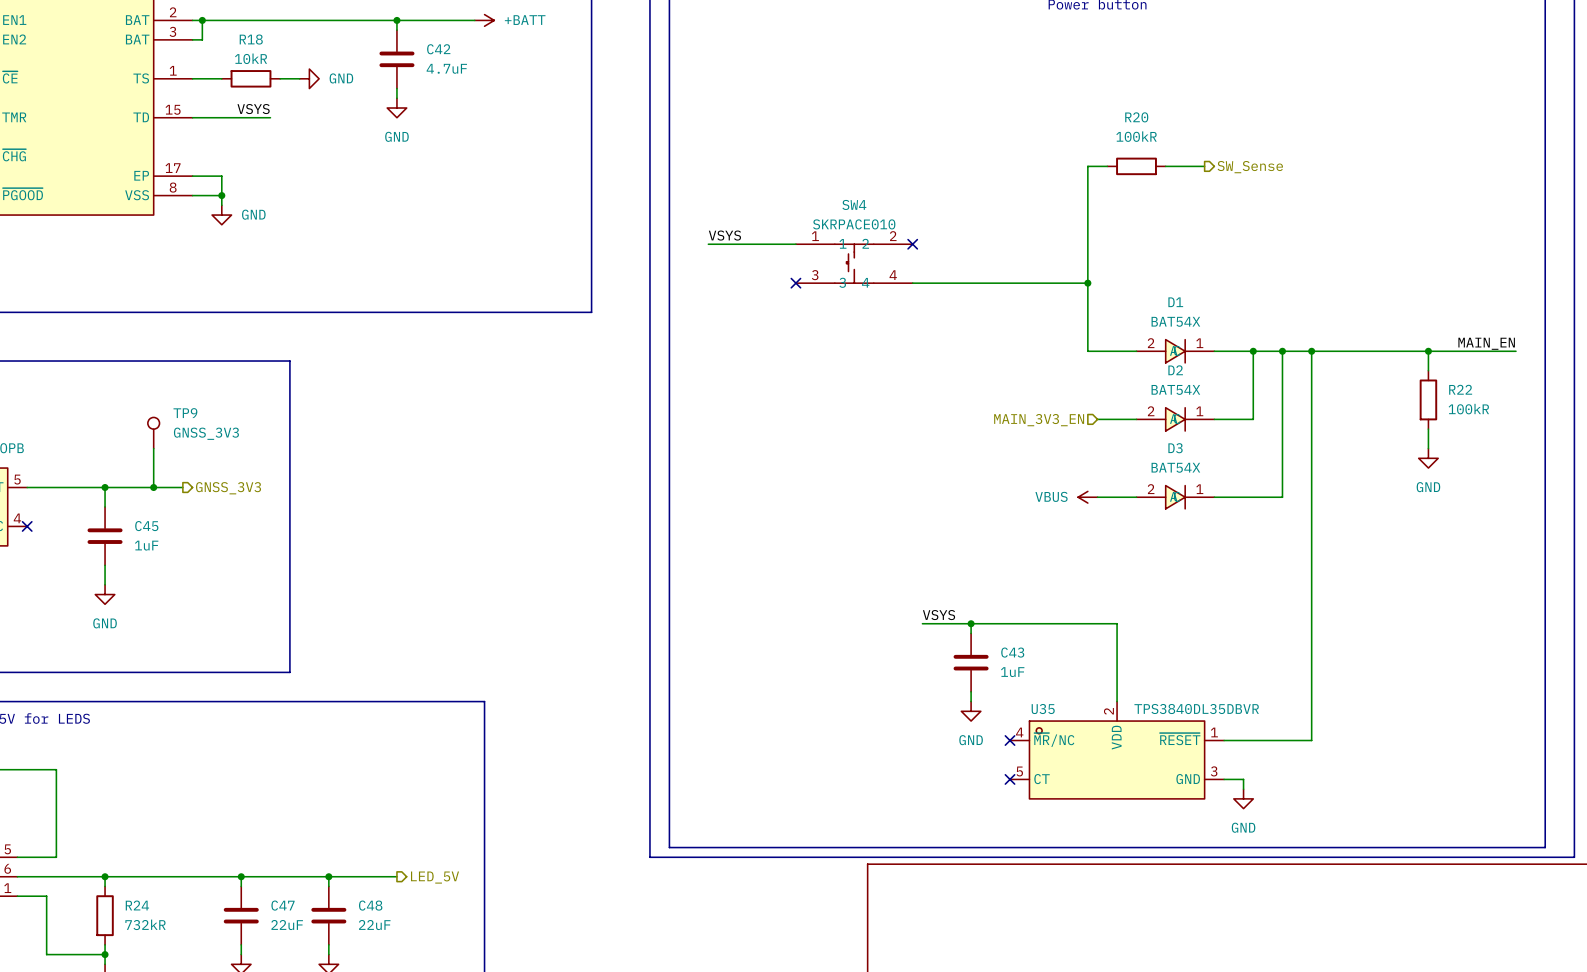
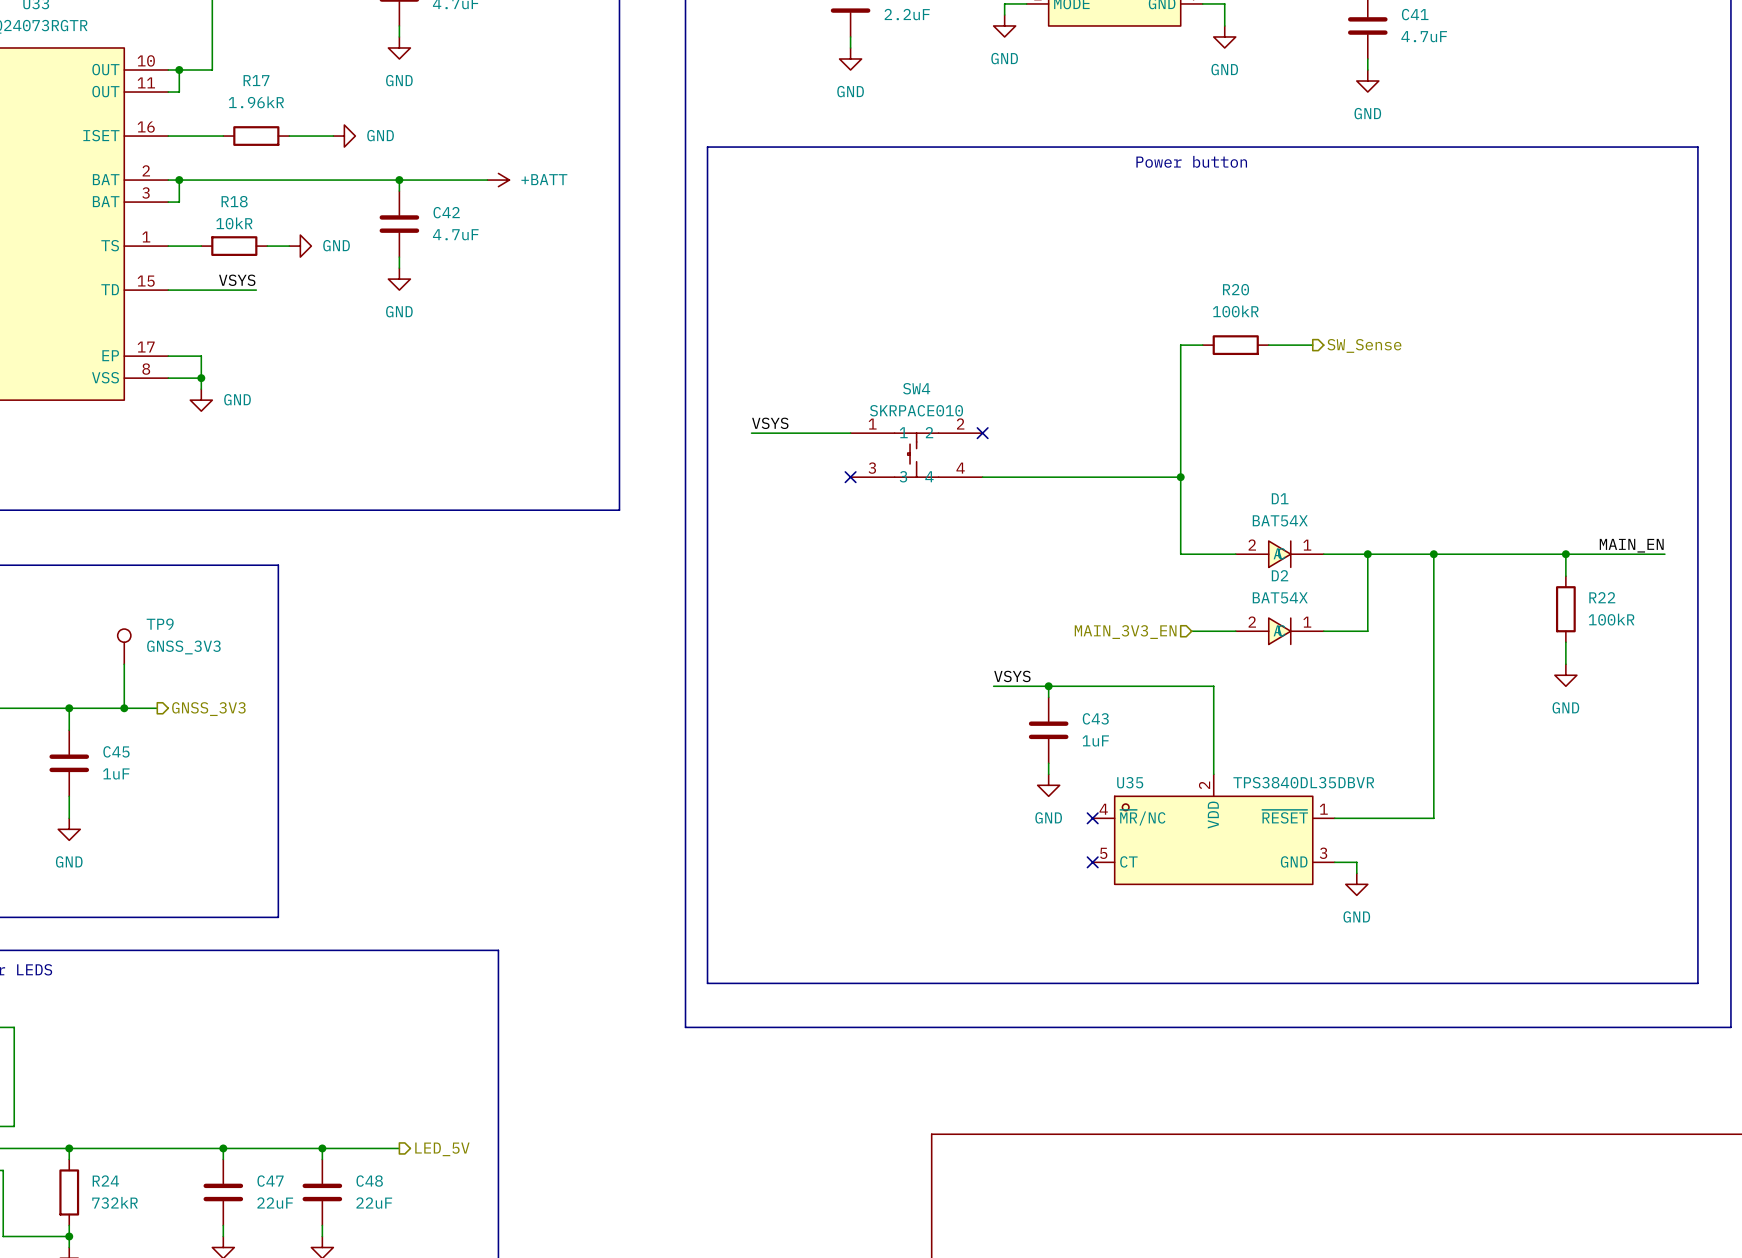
wire: (1282, 351) (1282, 497) (1214, 497) -> none
junction: (1282, 351) -> none
junction: none -> (1048, 686)
power symbol: VBUS (1087, 497) -> none
wire: (1097, 497) (1136, 497) -> none
D3: BAT54X (1175, 497) -> none
power symbol: none -> GND (1048, 785)
no-connect mark: none -> (1092, 818)
wire: (1311, 584) (1311, 740) (1224, 740) -> (1433, 818) (1334, 818)
label position: VSYS (939, 615) -> VSYS (1012, 676)
wire: (922, 623) (1117, 623) (1117, 701) -> (993, 686) (1213, 686) (1213, 774)
wire: (971, 623) (971, 633) -> (1048, 686) (1048, 697)
junction: (971, 623) -> none
no-connect mark: none -> (1092, 862)
power symbol: none -> GND (1356, 884)
C43 position: (971, 662) -> (1048, 730)
wire: (971, 691) (971, 701) -> (1048, 763) (1048, 774)
power symbol: GND (971, 711) -> none
line: (669, 730) (669, 847) (1545, 847) (1545, 730) -> (707, 983) (1697, 983)
no-connect mark: (1010, 740) -> none
U35 position: (1117, 750) -> (1213, 829)
line: (649, 769) (649, 857) (1574, 857) (1574, 769) -> (685, 1027) (1730, 1027)
no-connect mark: (1010, 779) -> none
wire: (1224, 779) (1243, 779) (1243, 789) -> (1334, 862) (1356, 862) (1356, 873)
power symbol: GND (1243, 798) -> none

